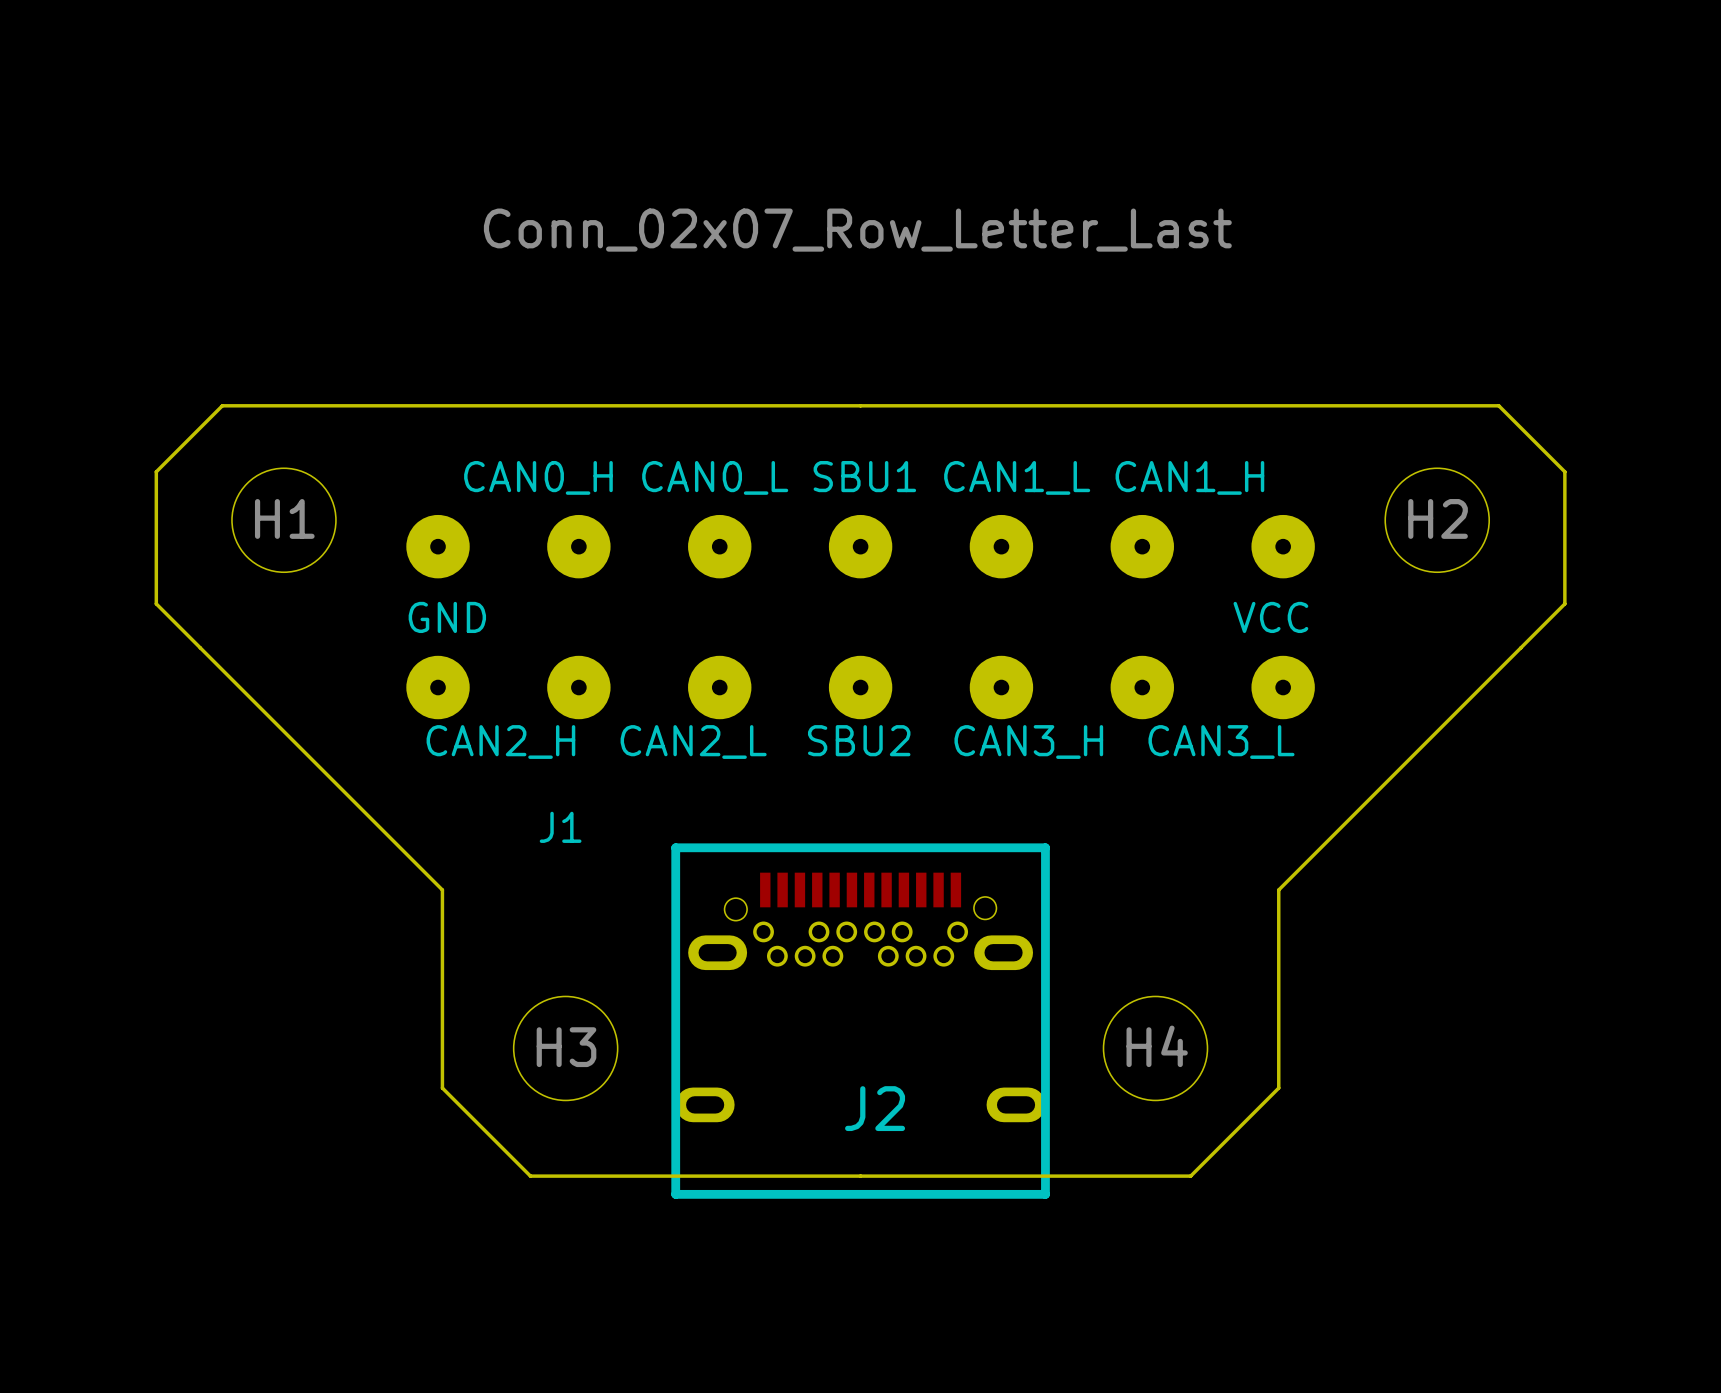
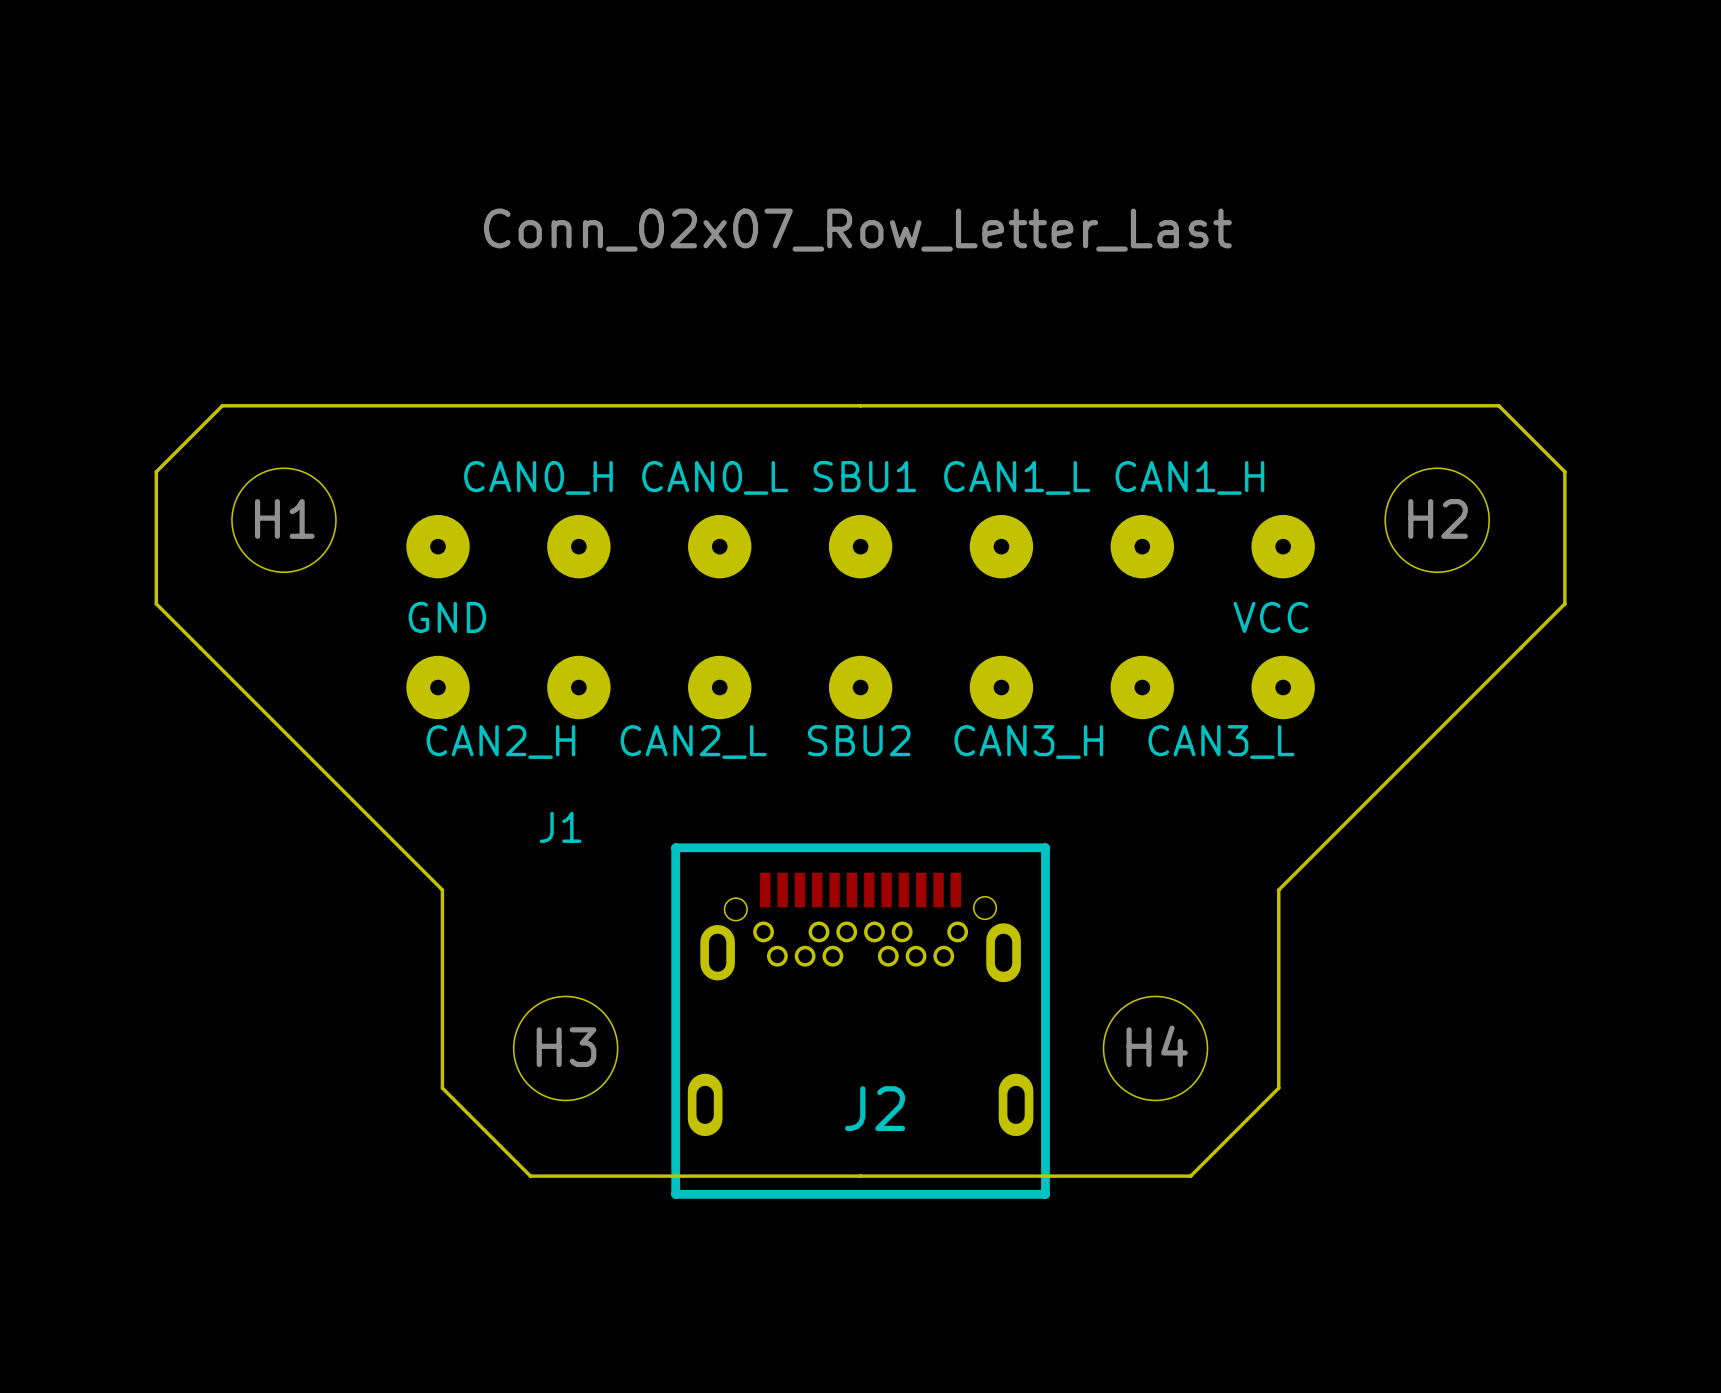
J2 footprint: [671, 843, 1050, 1199] -> [671, 843, 1050, 1199]

